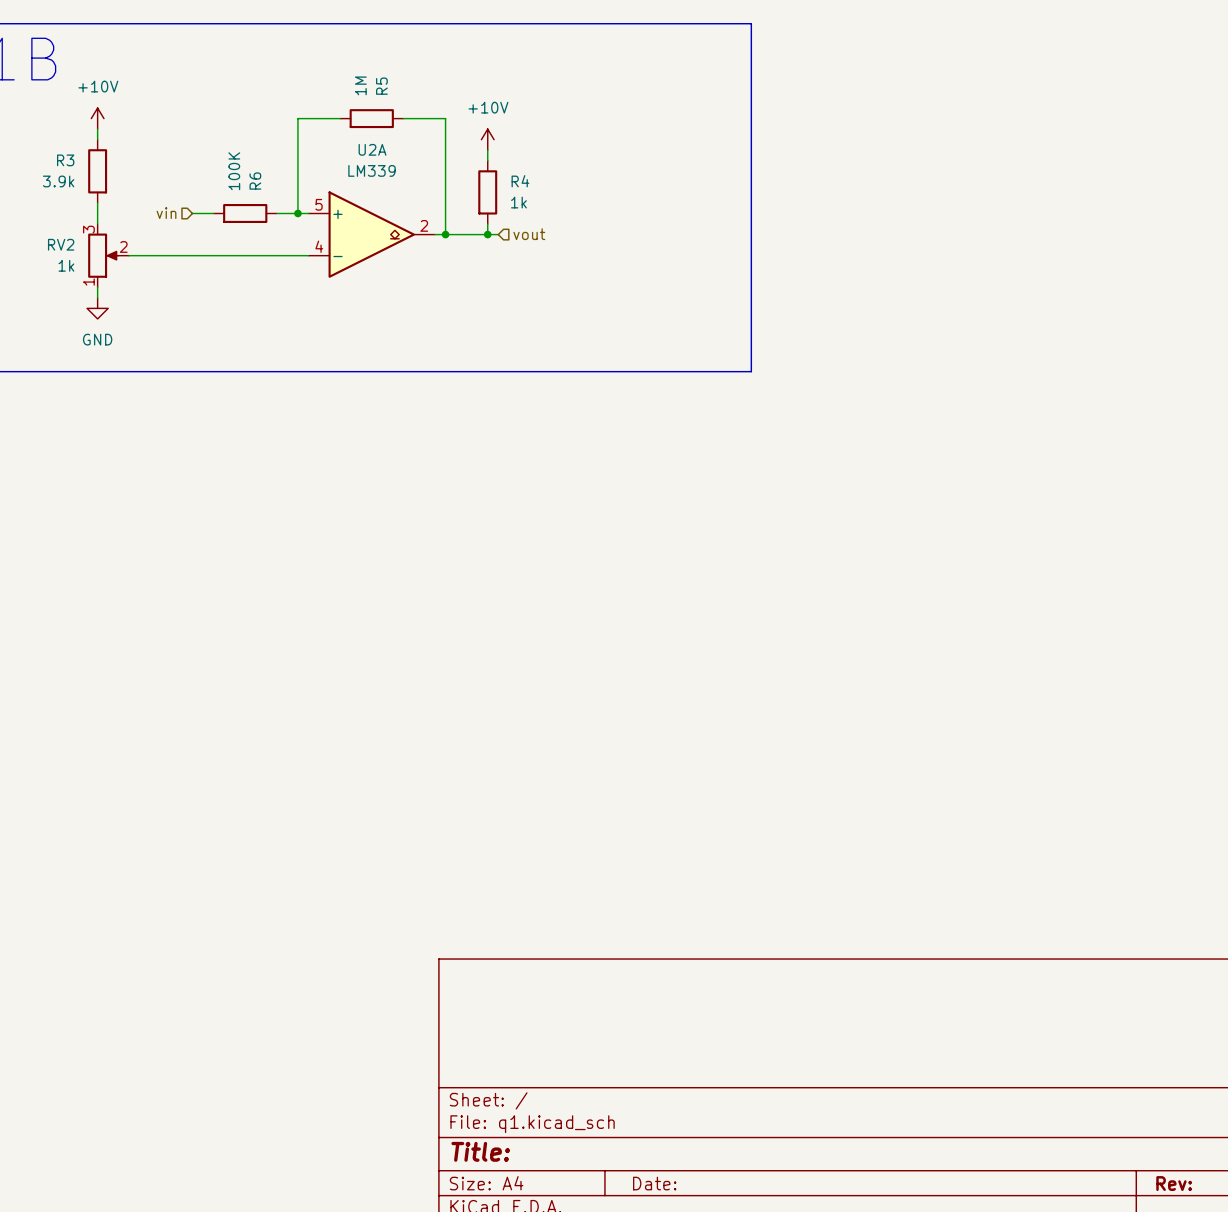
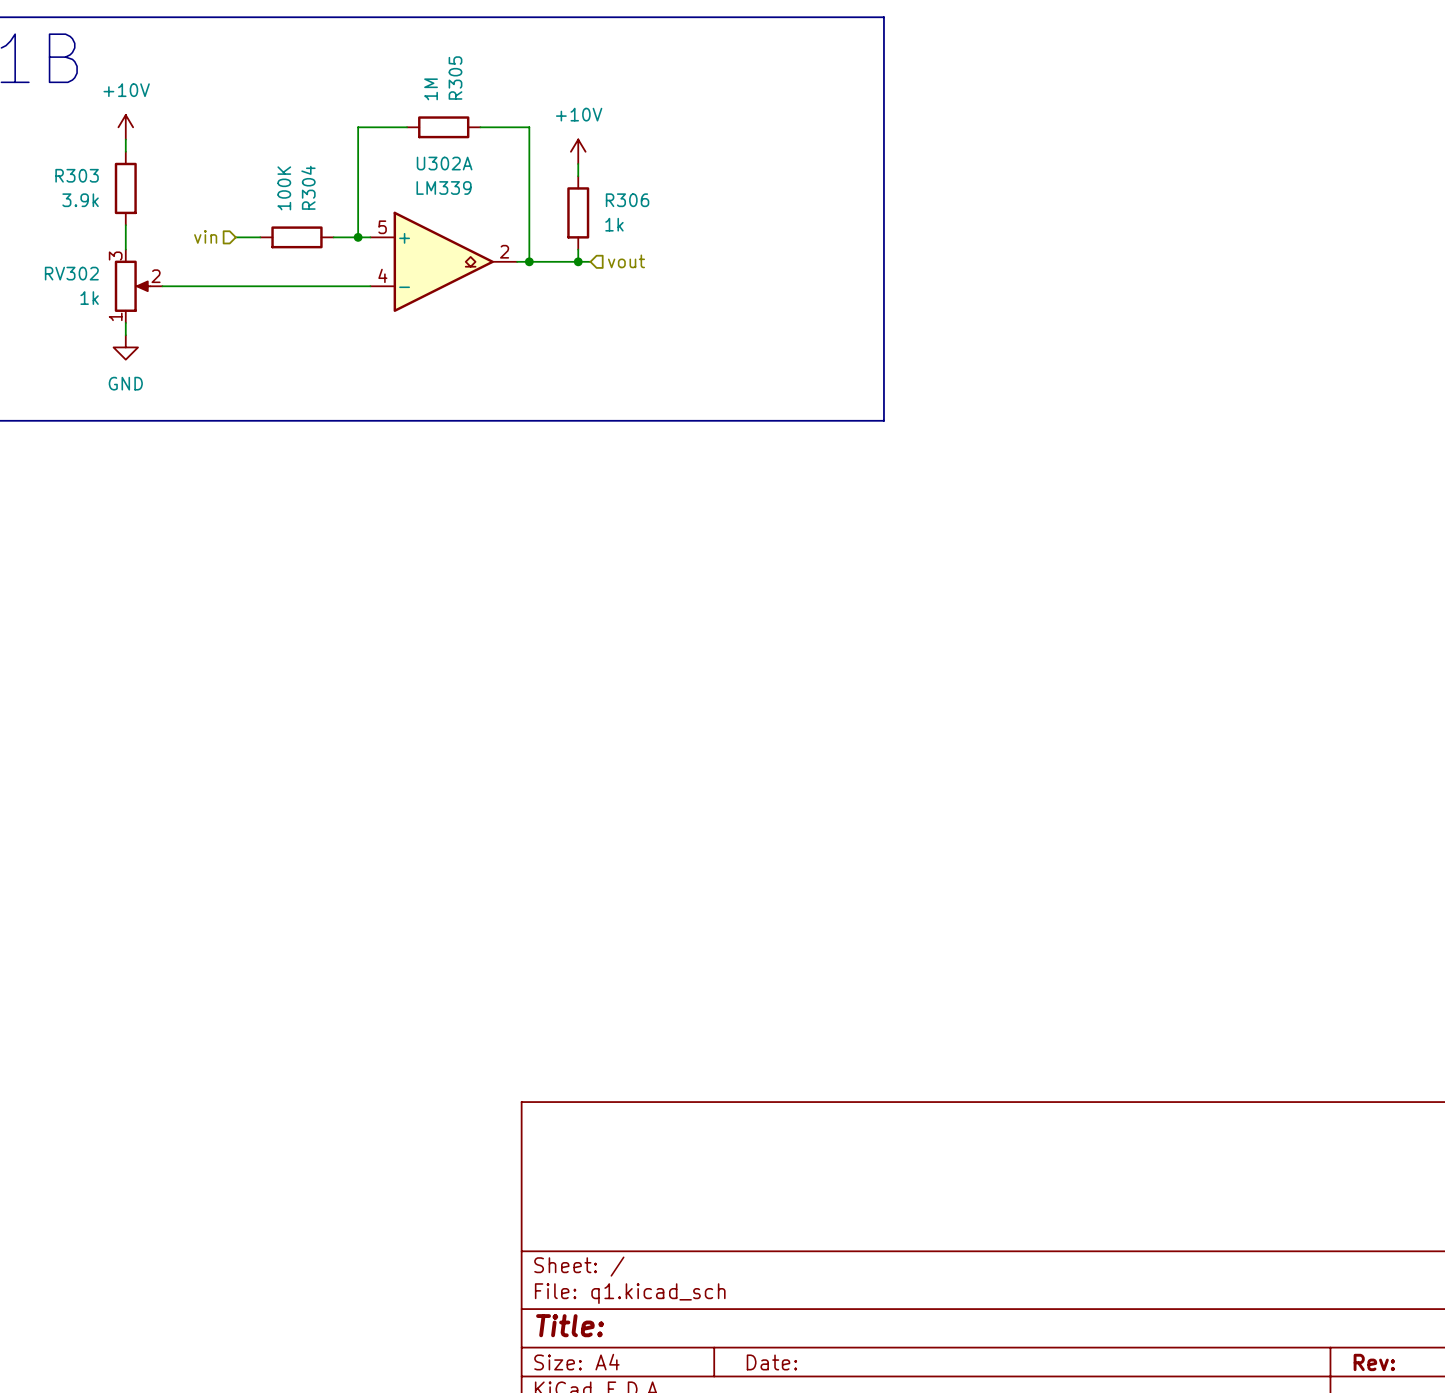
R5 name: R5 (381, 86) -> R305 (455, 78)
U2A name: U2A (372, 149) -> U302A (444, 163)
R3 name: R3 (65, 160) -> R303 (77, 175)
R6 name: R6 (255, 181) -> R304 (308, 187)
R4 name: R4 (520, 181) -> R306 (627, 200)
RV2 name: RV2 (61, 244) -> RV302 (71, 273)

